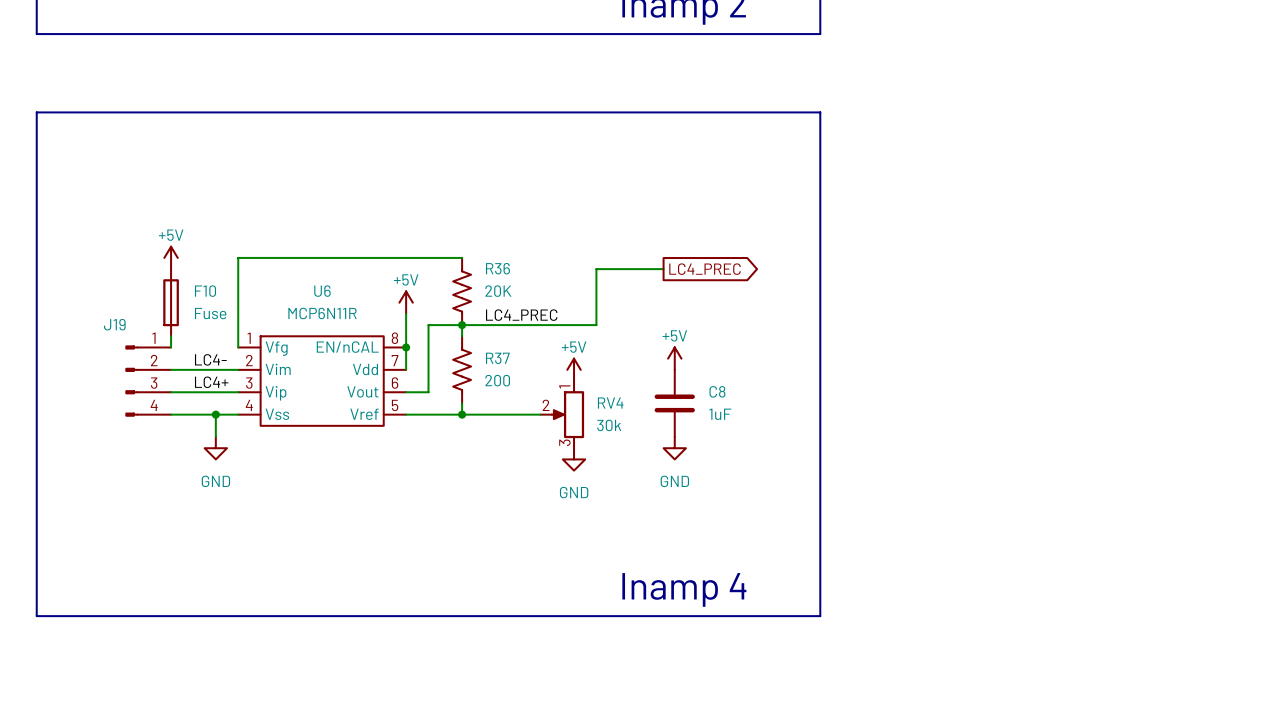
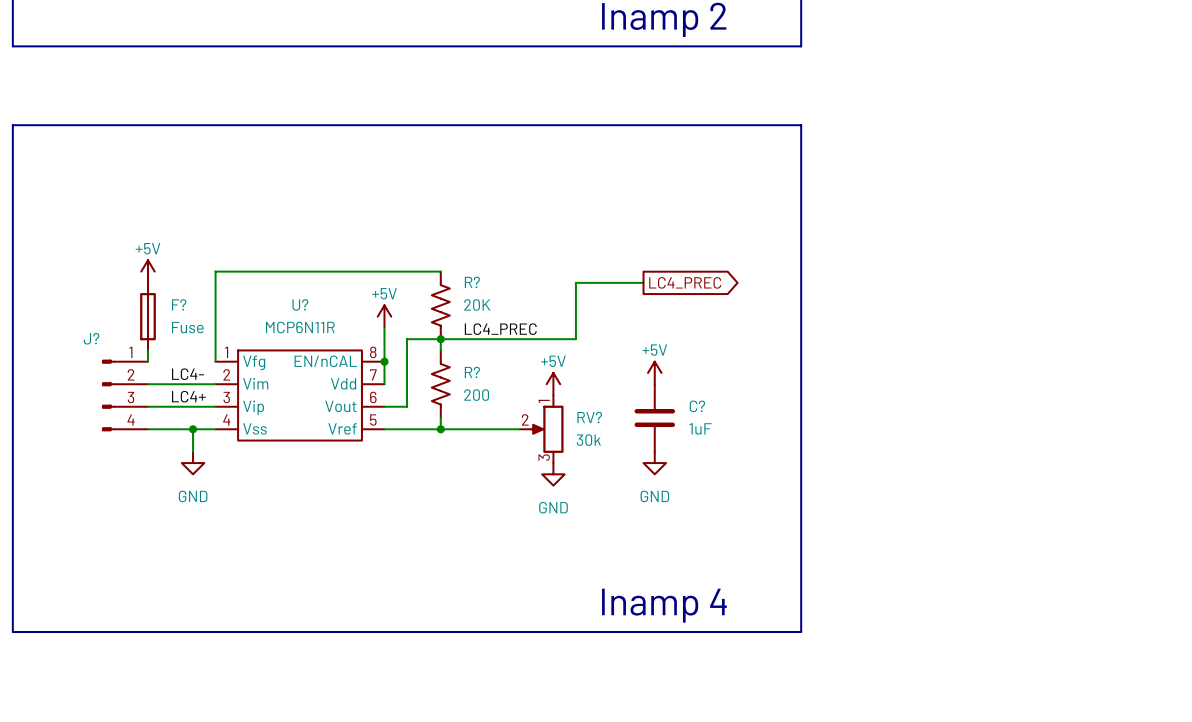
R36 name: R36 (497, 268) -> R? (472, 282)
F10 name: F10 (205, 291) -> F? (179, 304)
U6 name: U6 (322, 291) -> U? (300, 304)
J19 name: J19 (114, 324) -> J? (91, 338)
R37 name: R37 (497, 358) -> R? (472, 372)
C8 name: C8 (717, 391) -> C? (697, 406)
RV4 name: RV4 (610, 403) -> RV? (589, 417)

